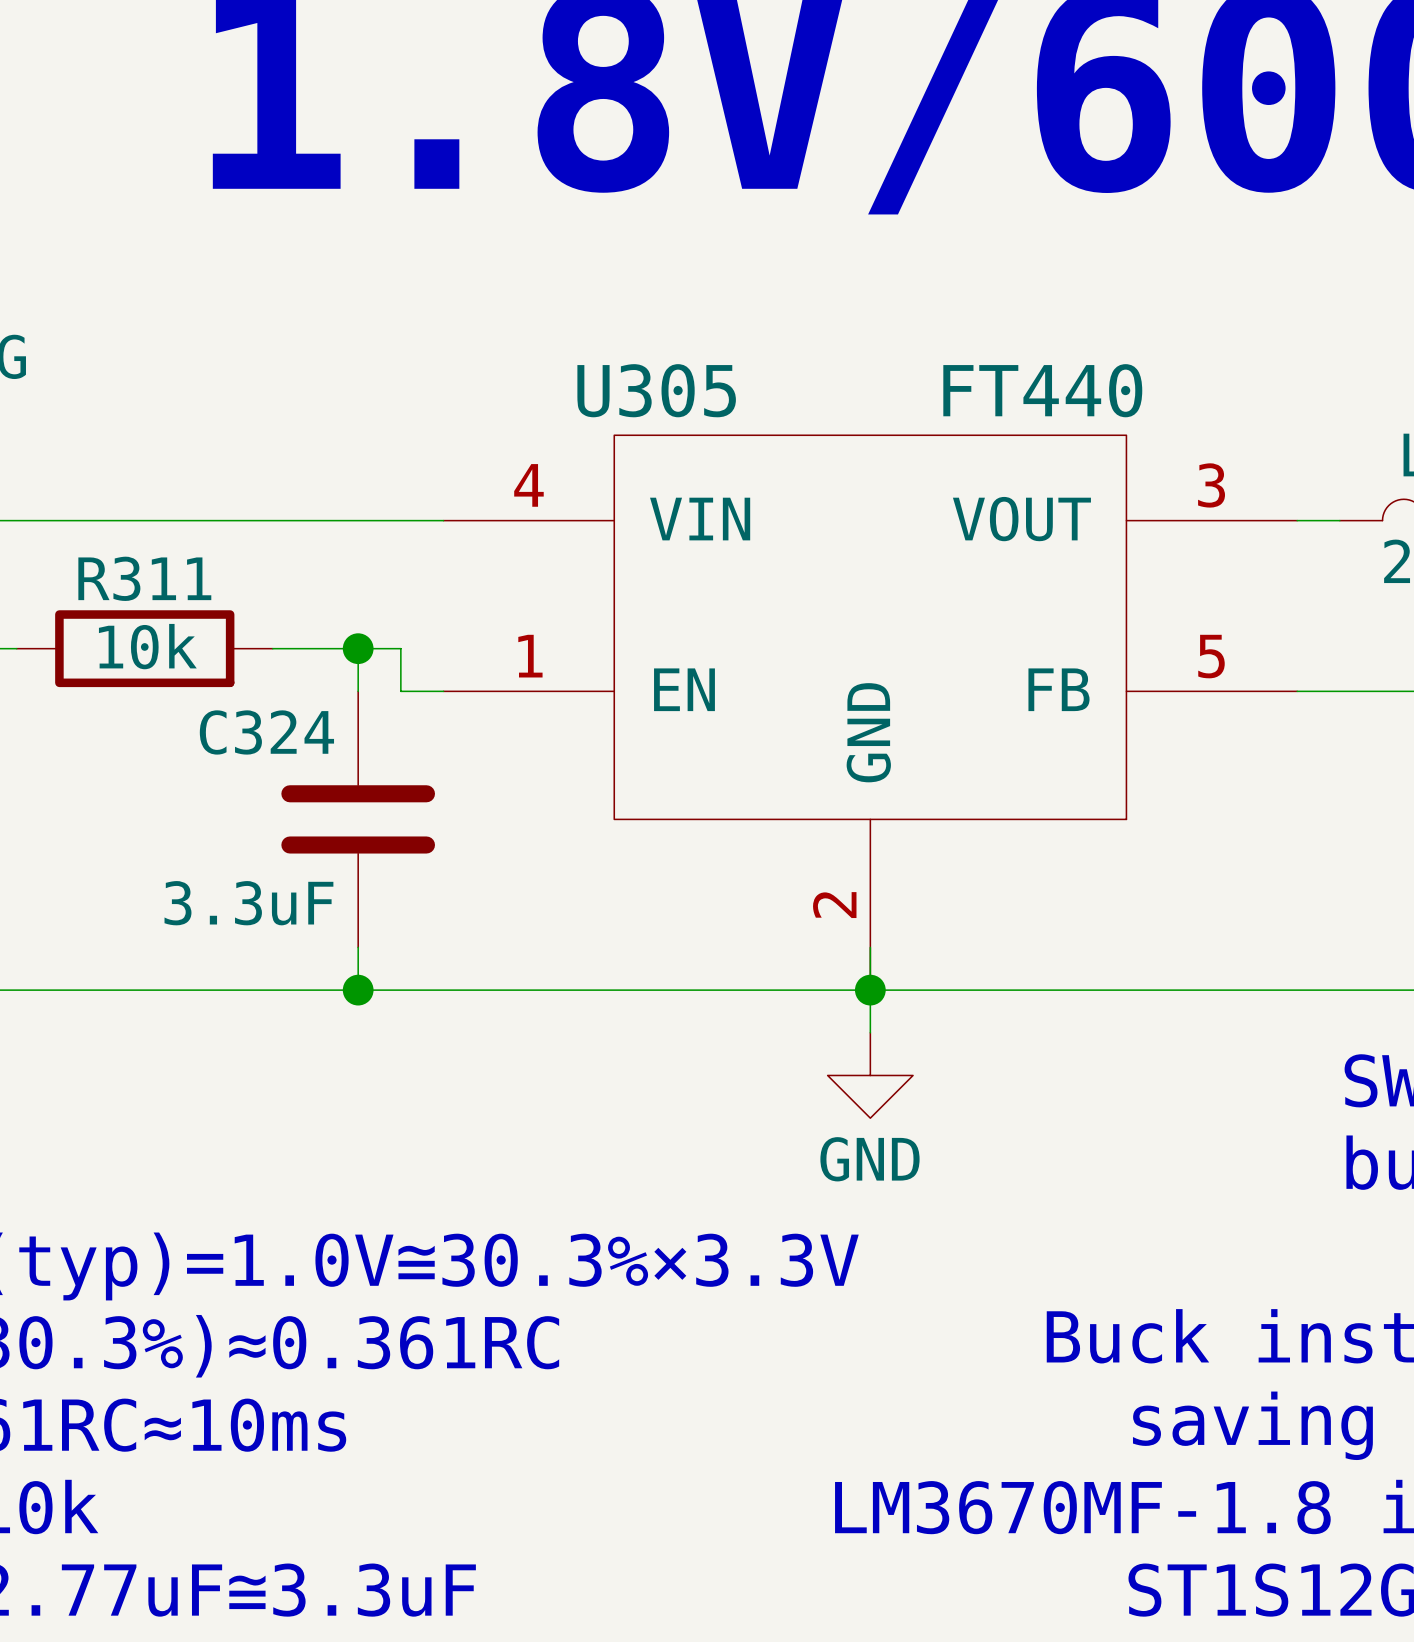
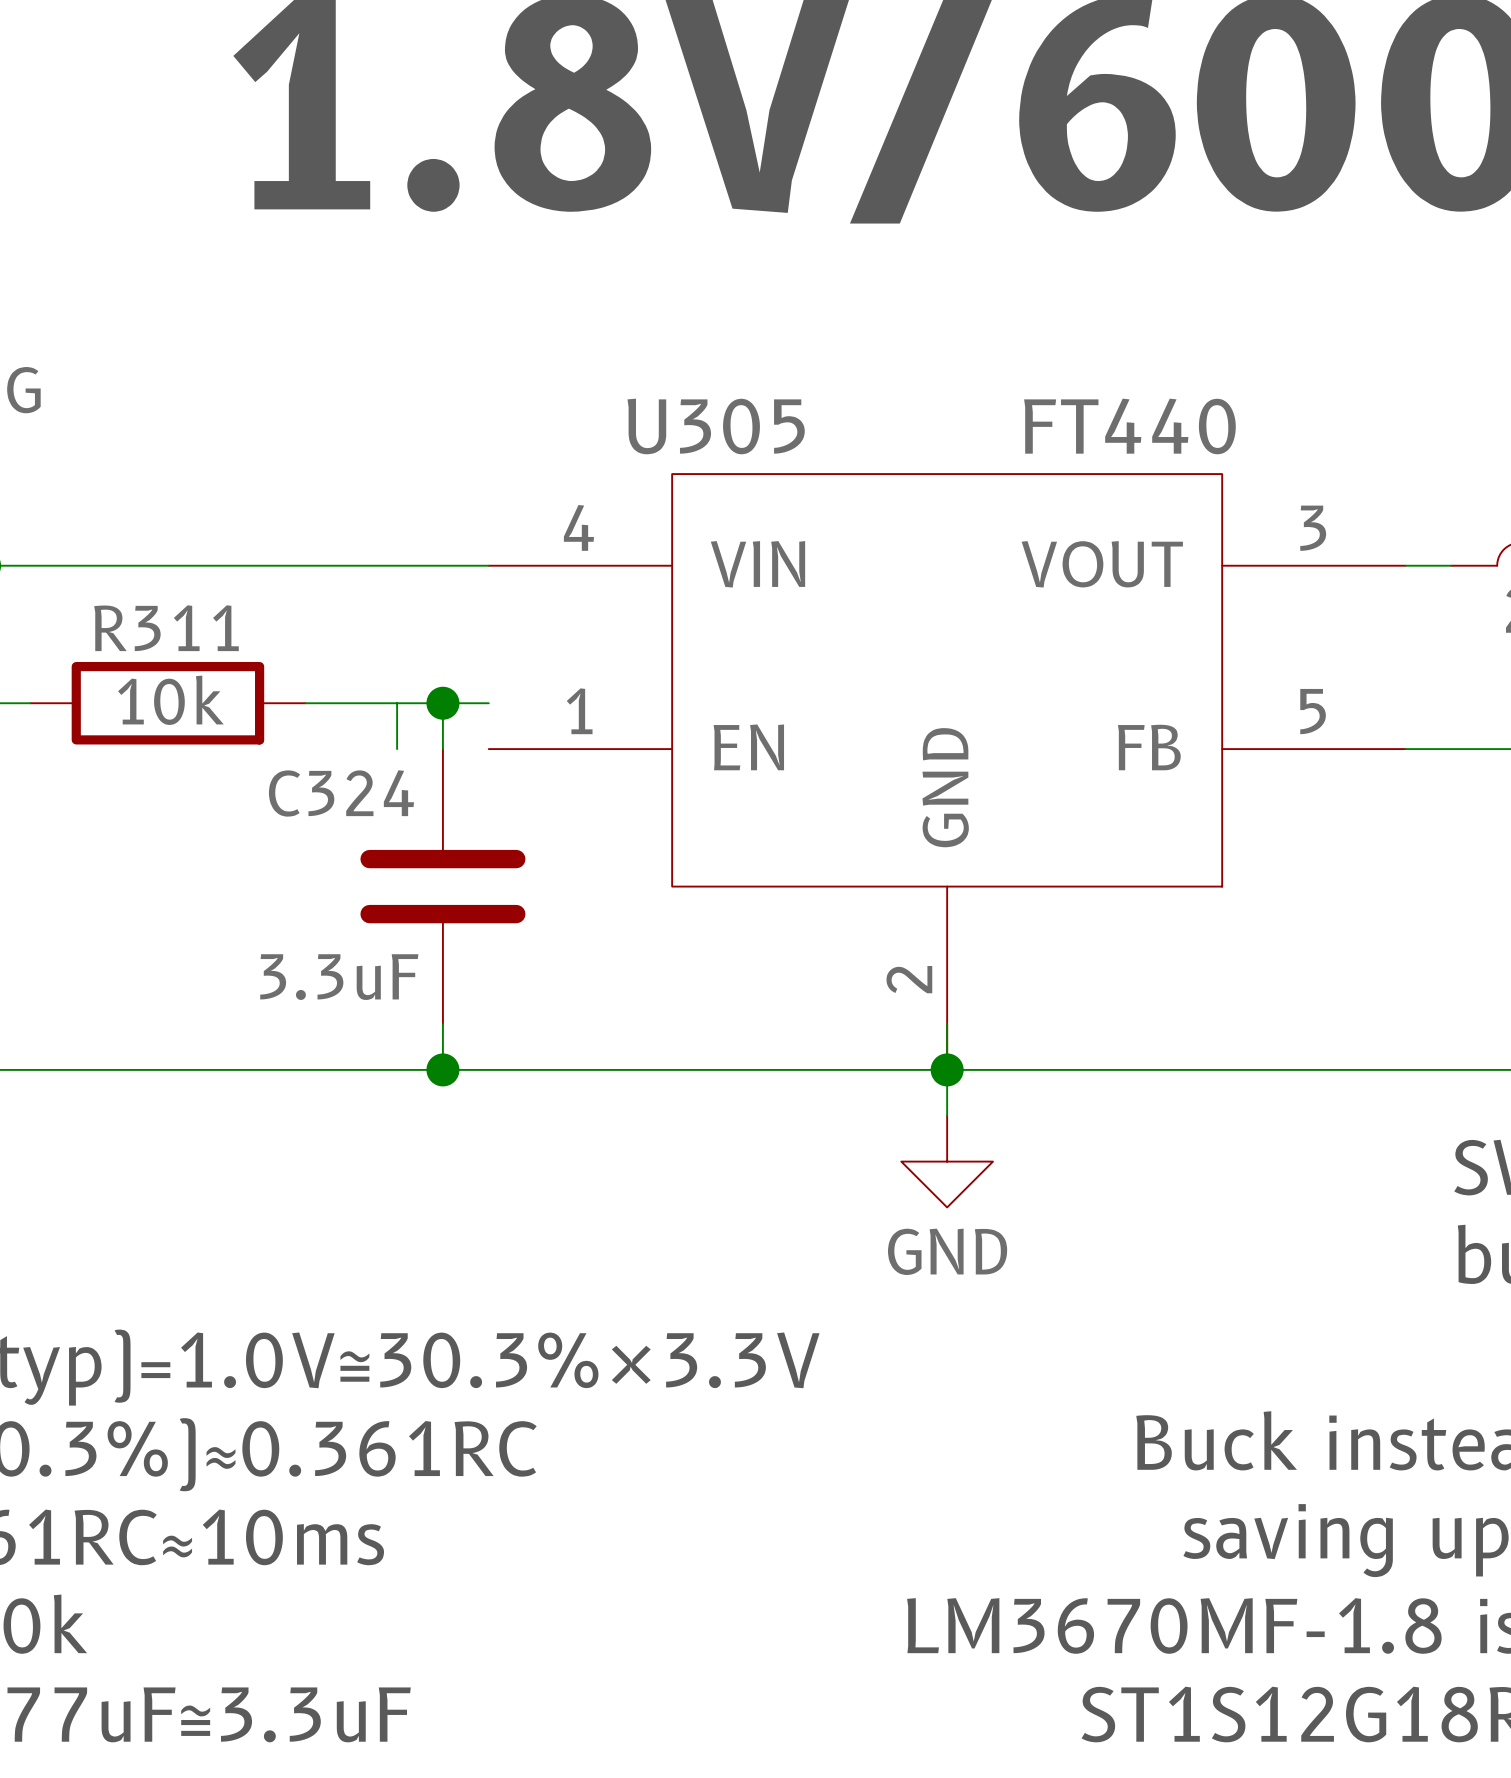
junction position: (358, 648) -> (442, 703)
wire: (400, 691) (443, 691) -> (442, 703) (488, 703)
C324 position: (358, 819) -> (442, 886)
wire: (358, 947) (358, 990) -> (442, 1024) (442, 1069)
junction position: (358, 990) -> (442, 1069)

